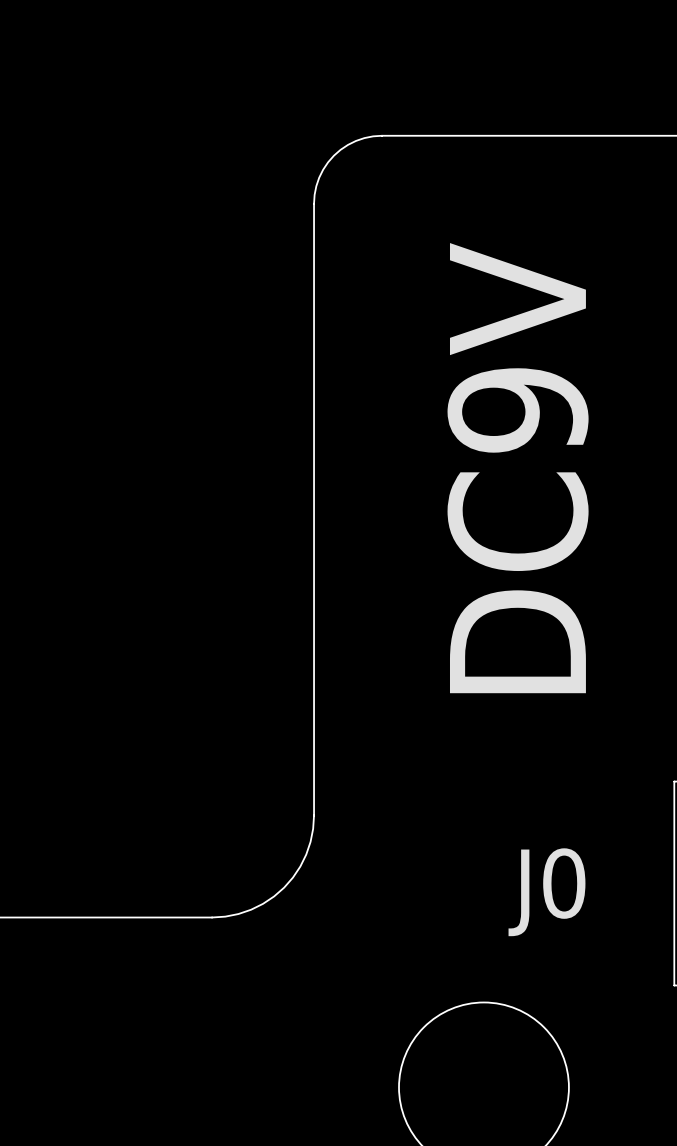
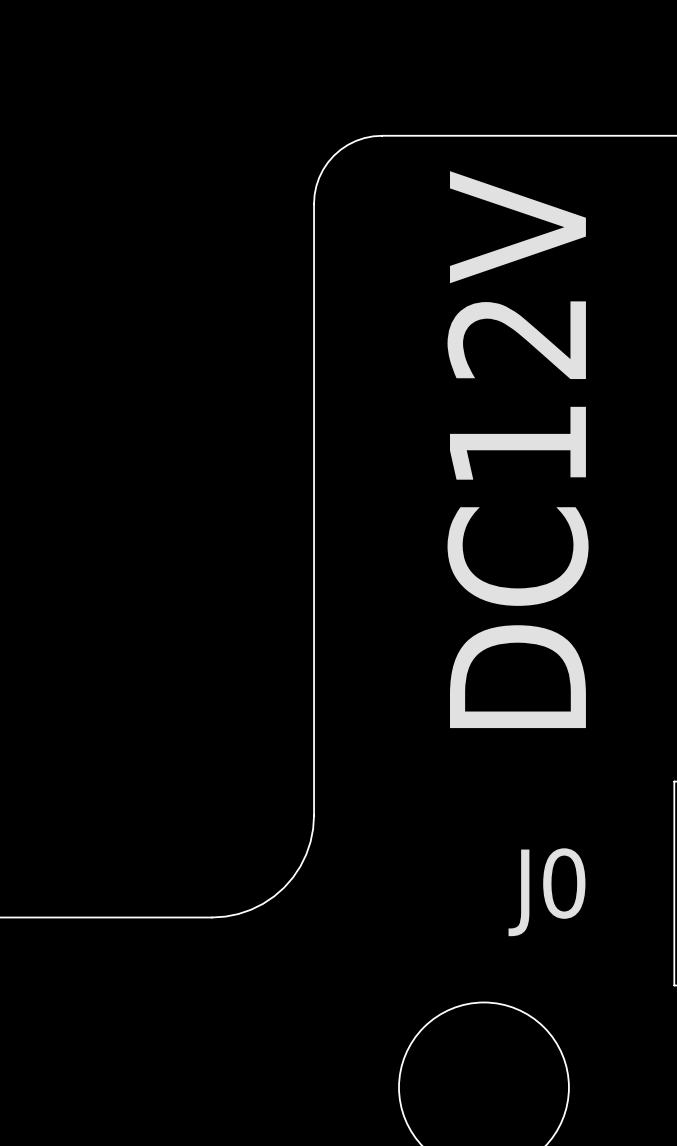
text: DC9V (518, 468) -> DC12V (518, 449)

